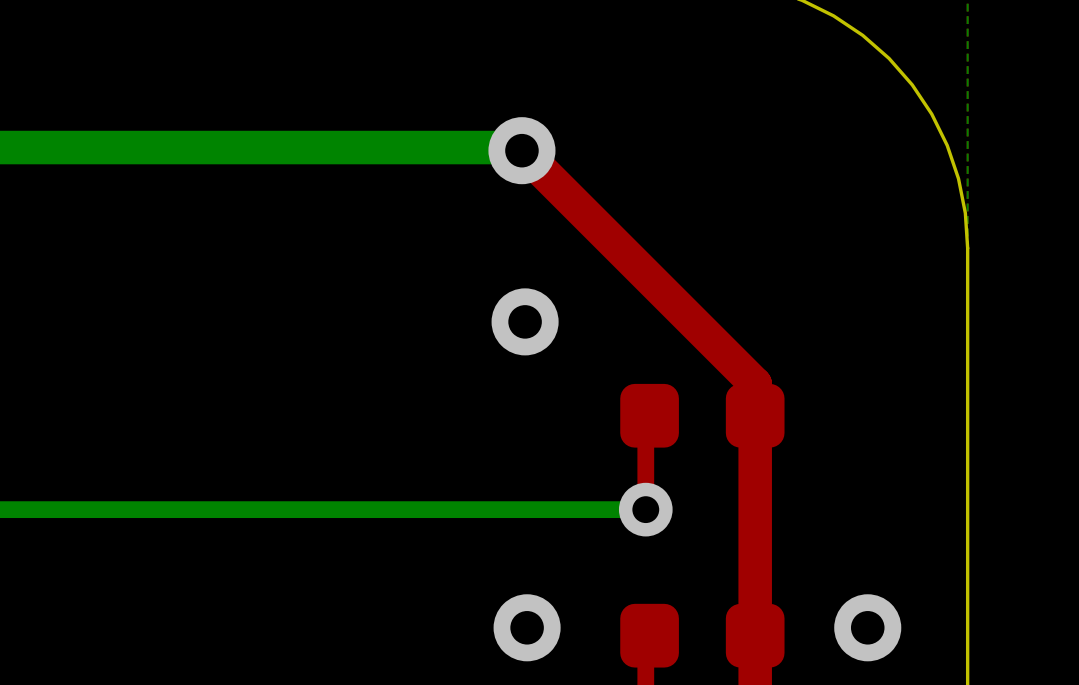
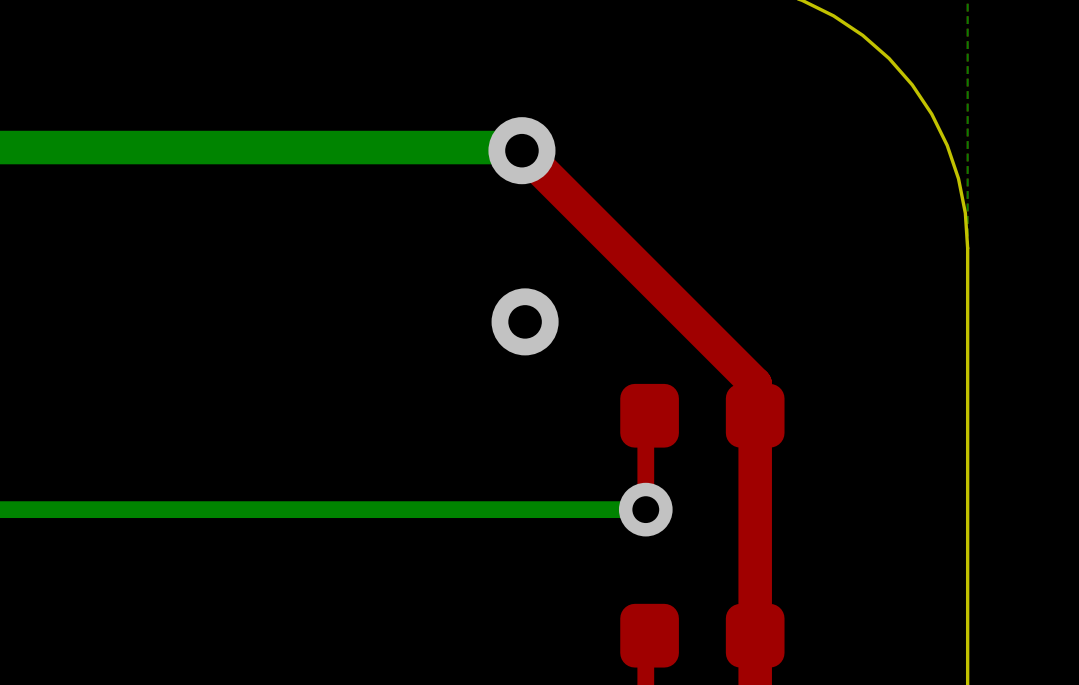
via: (527, 627) -> none
via: (867, 627) -> none

